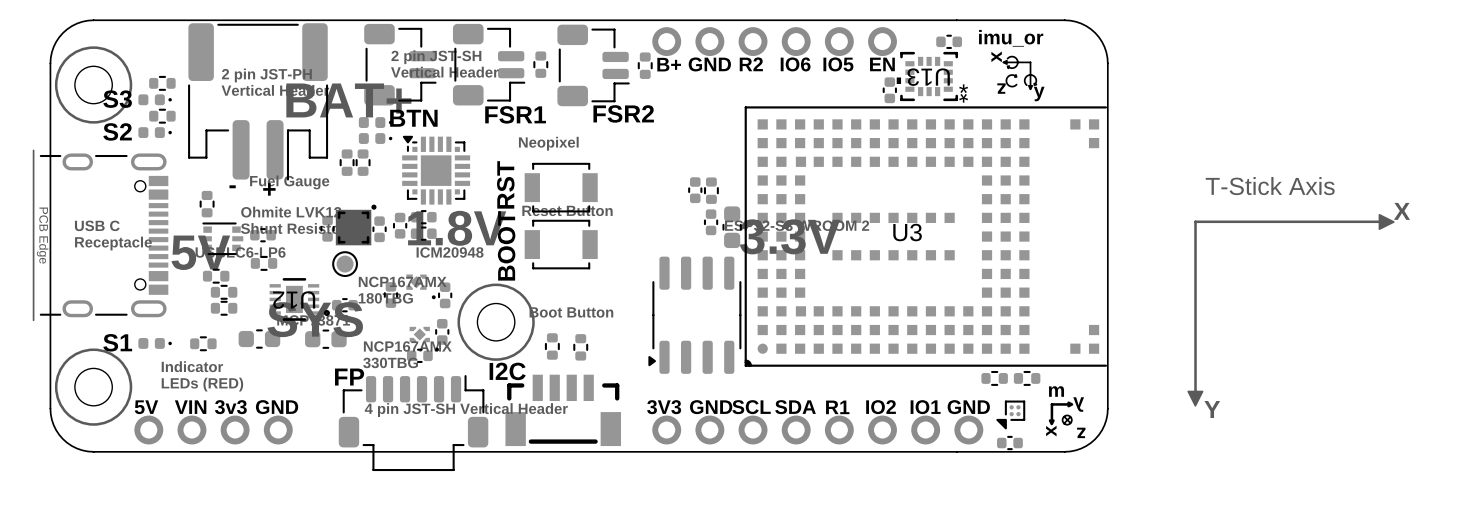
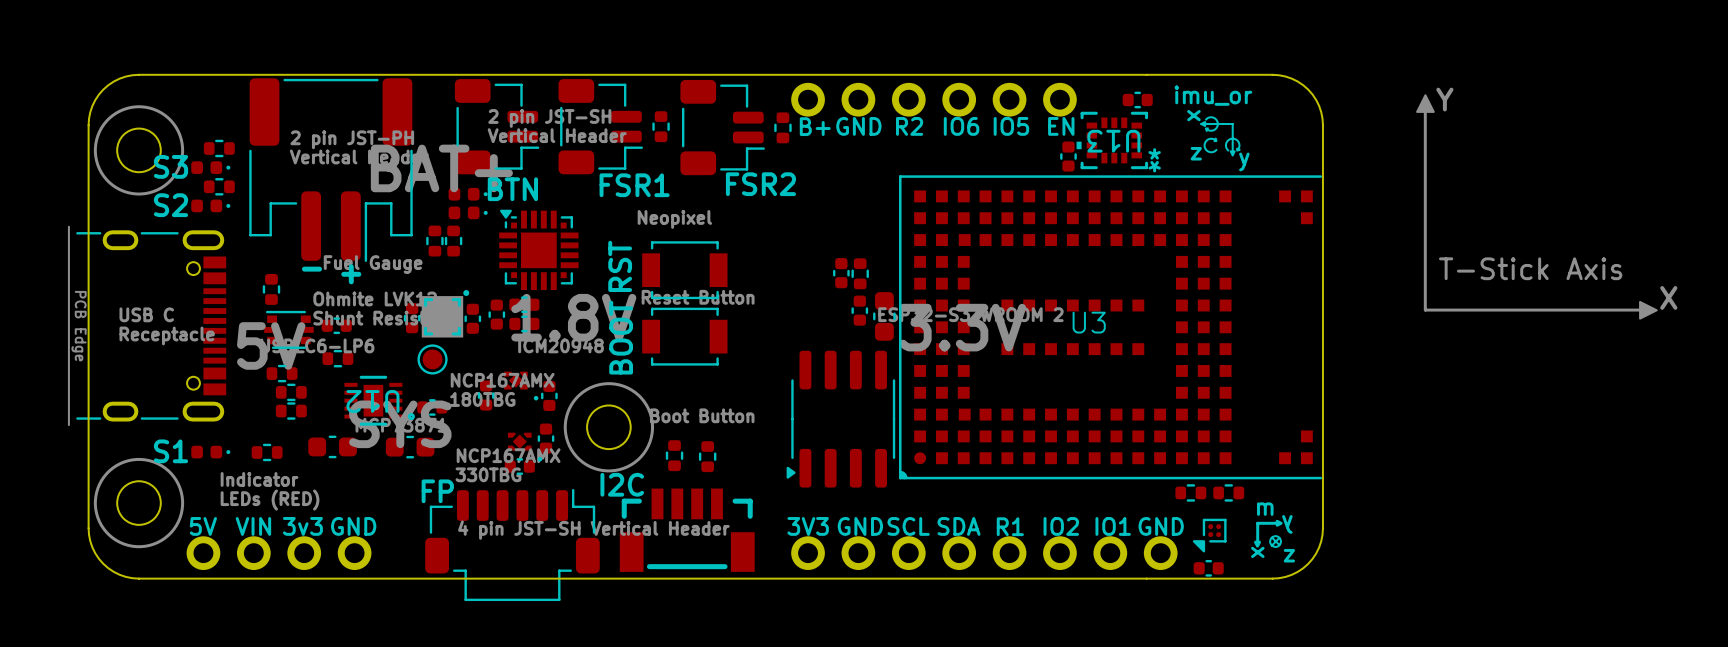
drawing: none -> [1416, 94, 1435, 113]
line: (1195, 221) (1195, 393) -> (1425, 310) (1425, 110)
drawing: [1187, 390, 1204, 407] -> none
text position: Y (1212, 409) -> Y (1444, 99)

